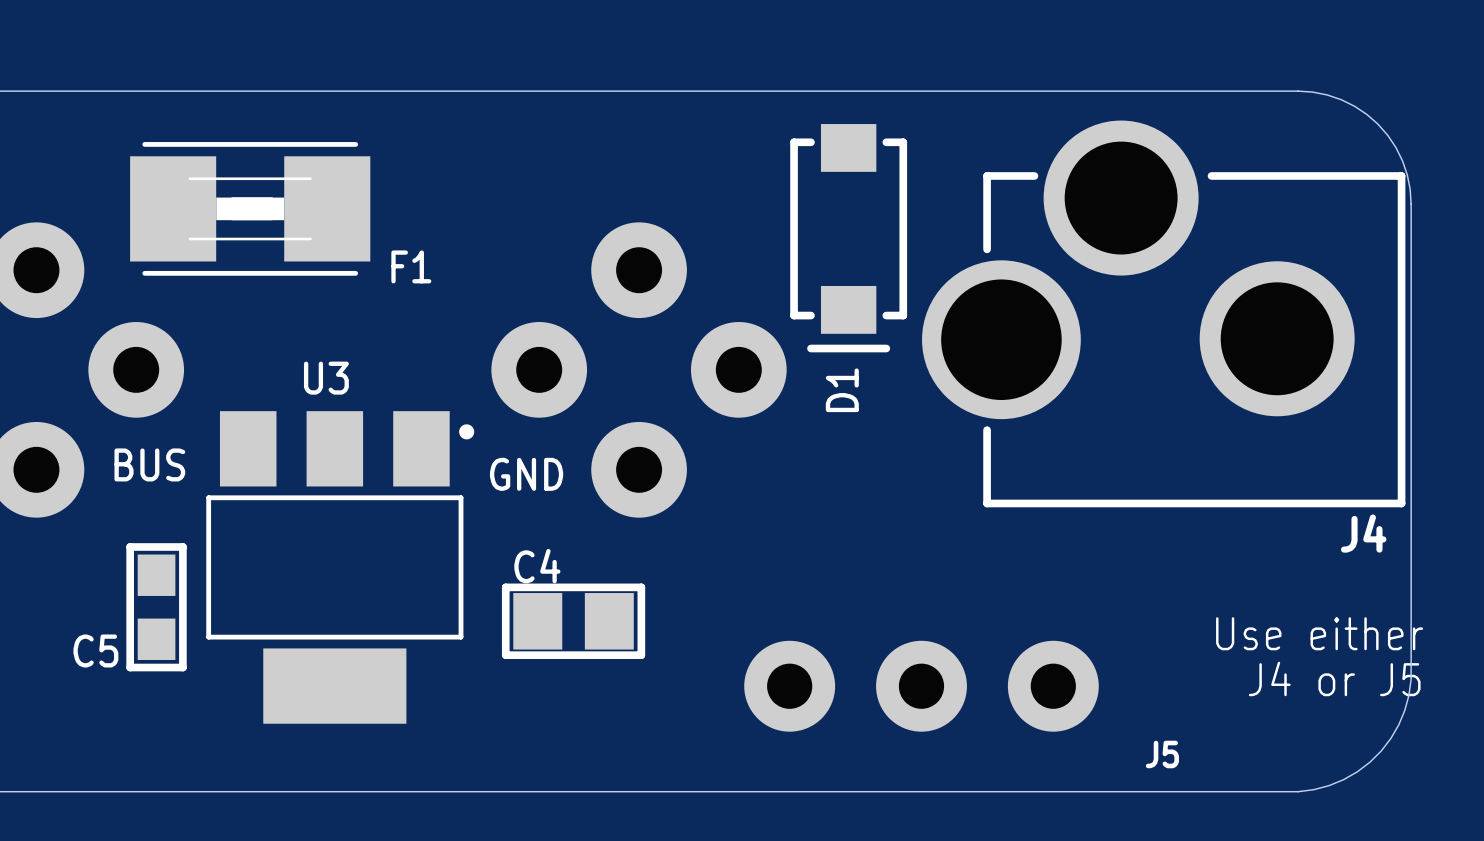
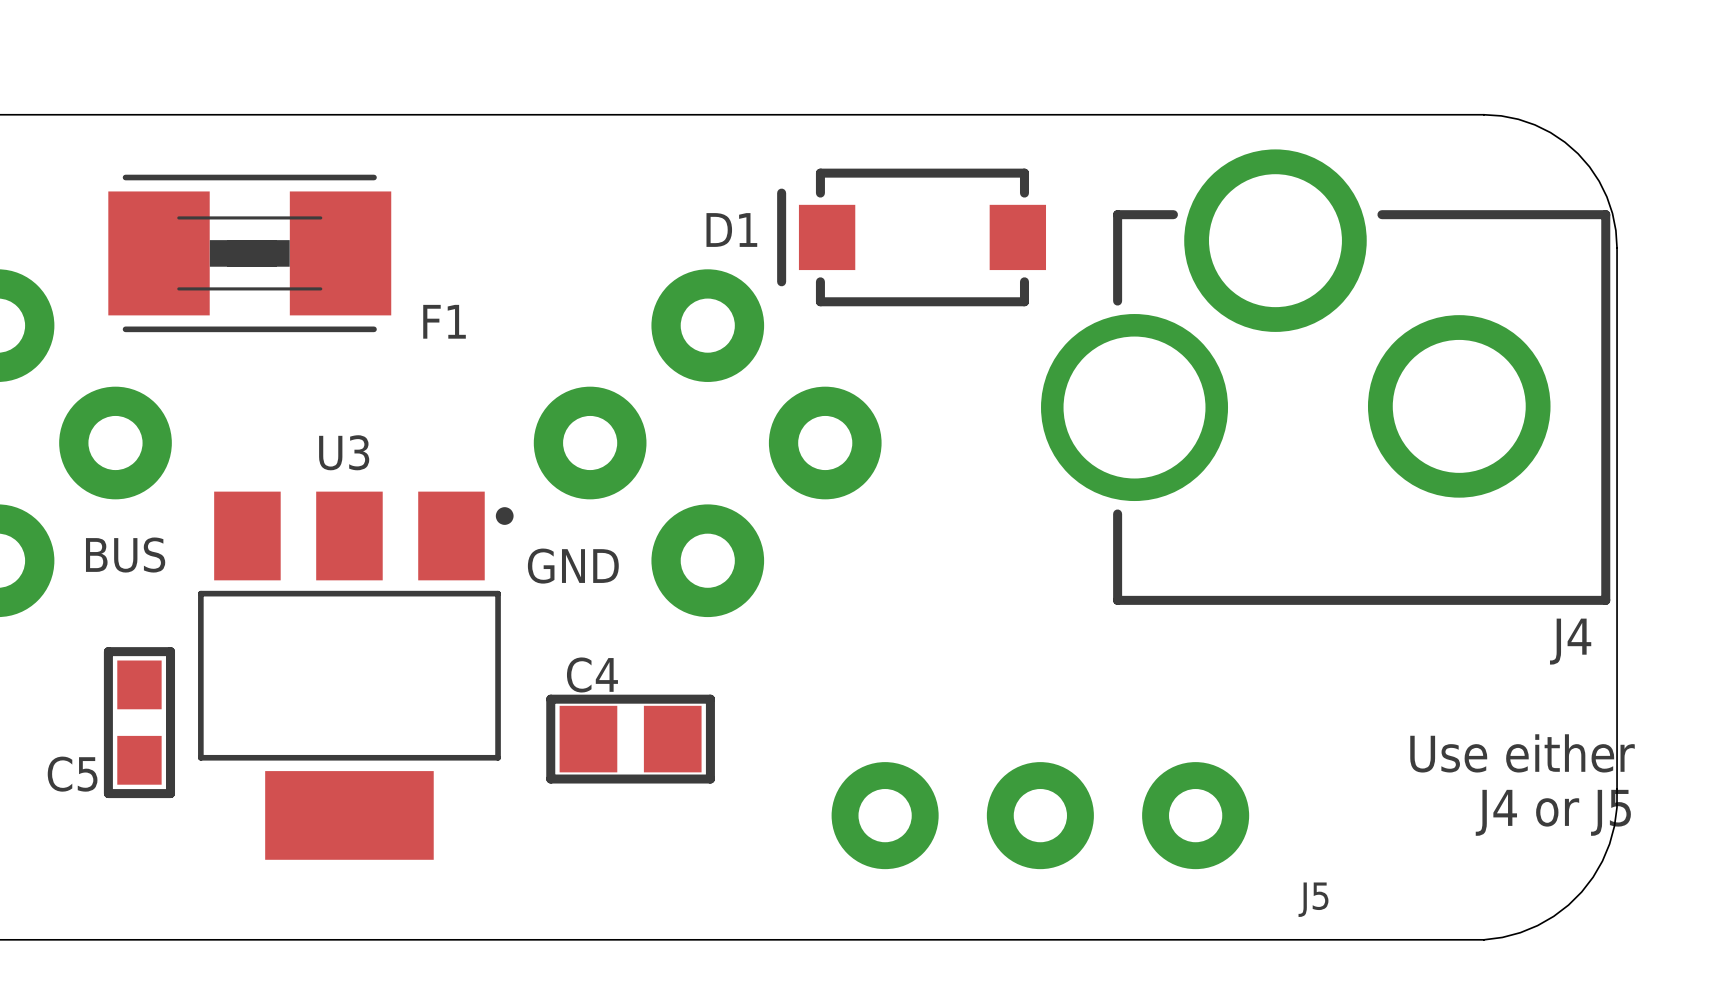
D1 rotation: 0° (848, 238) -> 90° clockwise (911, 237)

